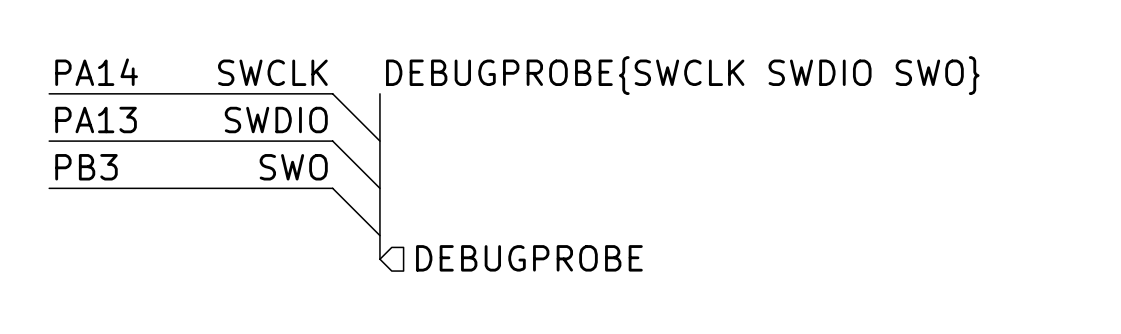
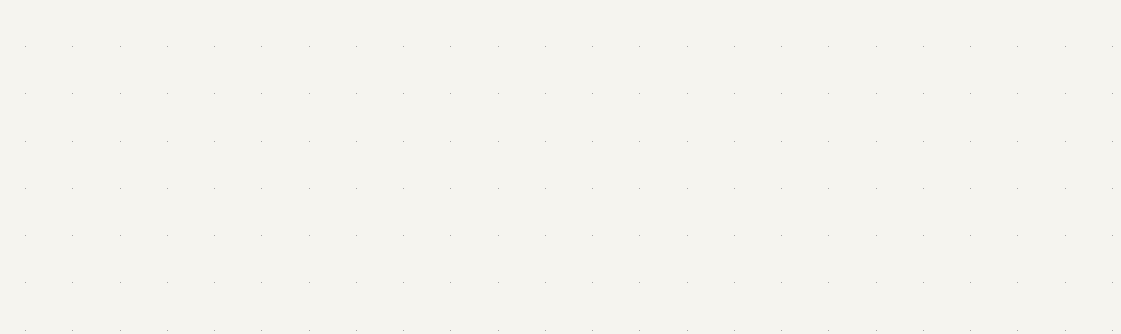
label: PA14 (96, 72) -> none
label: SWCLK (272, 72) -> none
label: DEBUGPROBE{SWCLK SWDIO SWO} (682, 75) -> none
wire: (49, 93) (332, 93) (379, 141) -> none
bus: (379, 93) (379, 259) -> none
label: PA13 (96, 120) -> none
label: SWDIO (276, 120) -> none
wire: (49, 141) (332, 141) (379, 188) -> none
label: PB3 (86, 167) -> none
label: SWO (293, 167) -> none
wire: (49, 188) (332, 188) (379, 235) -> none
hierarchical label: DEBUGPROBE (529, 258) -> none

